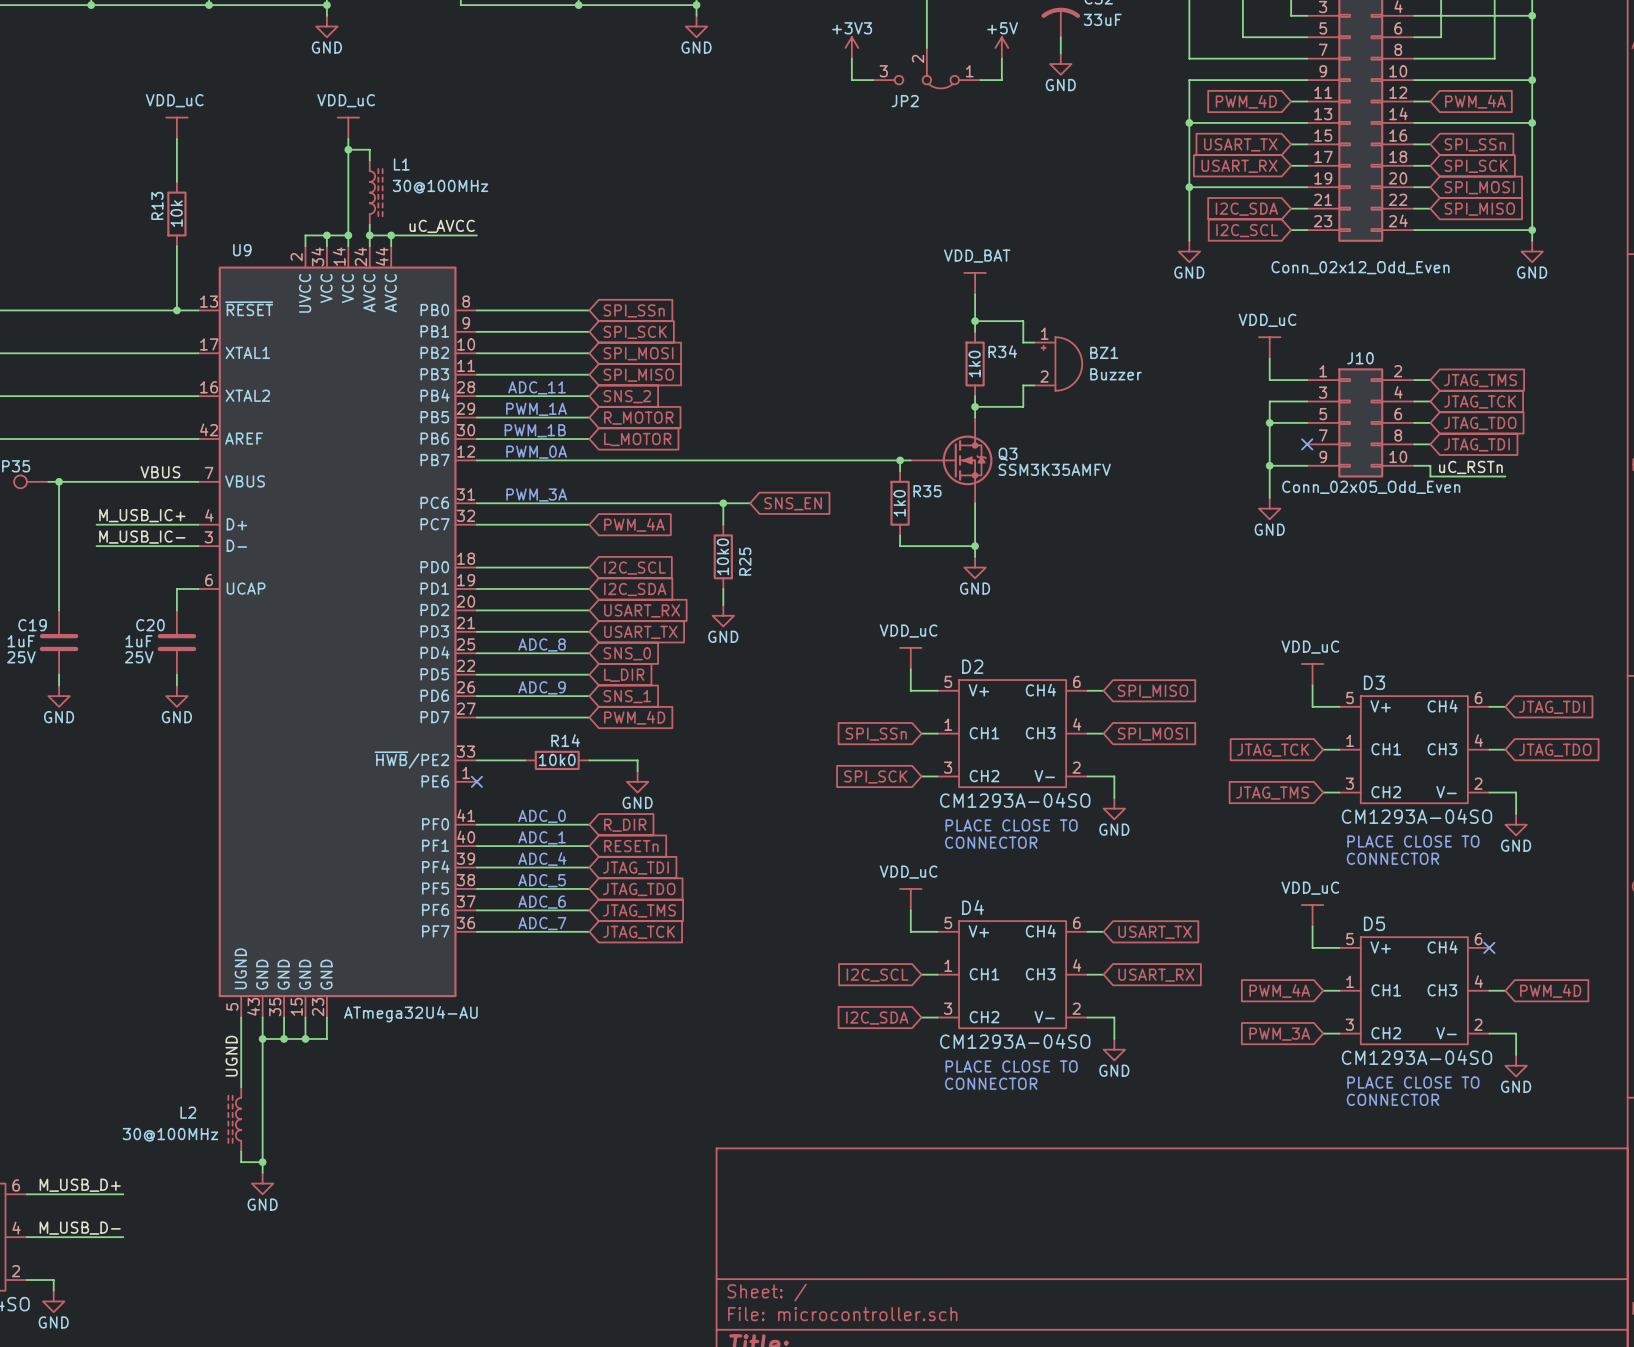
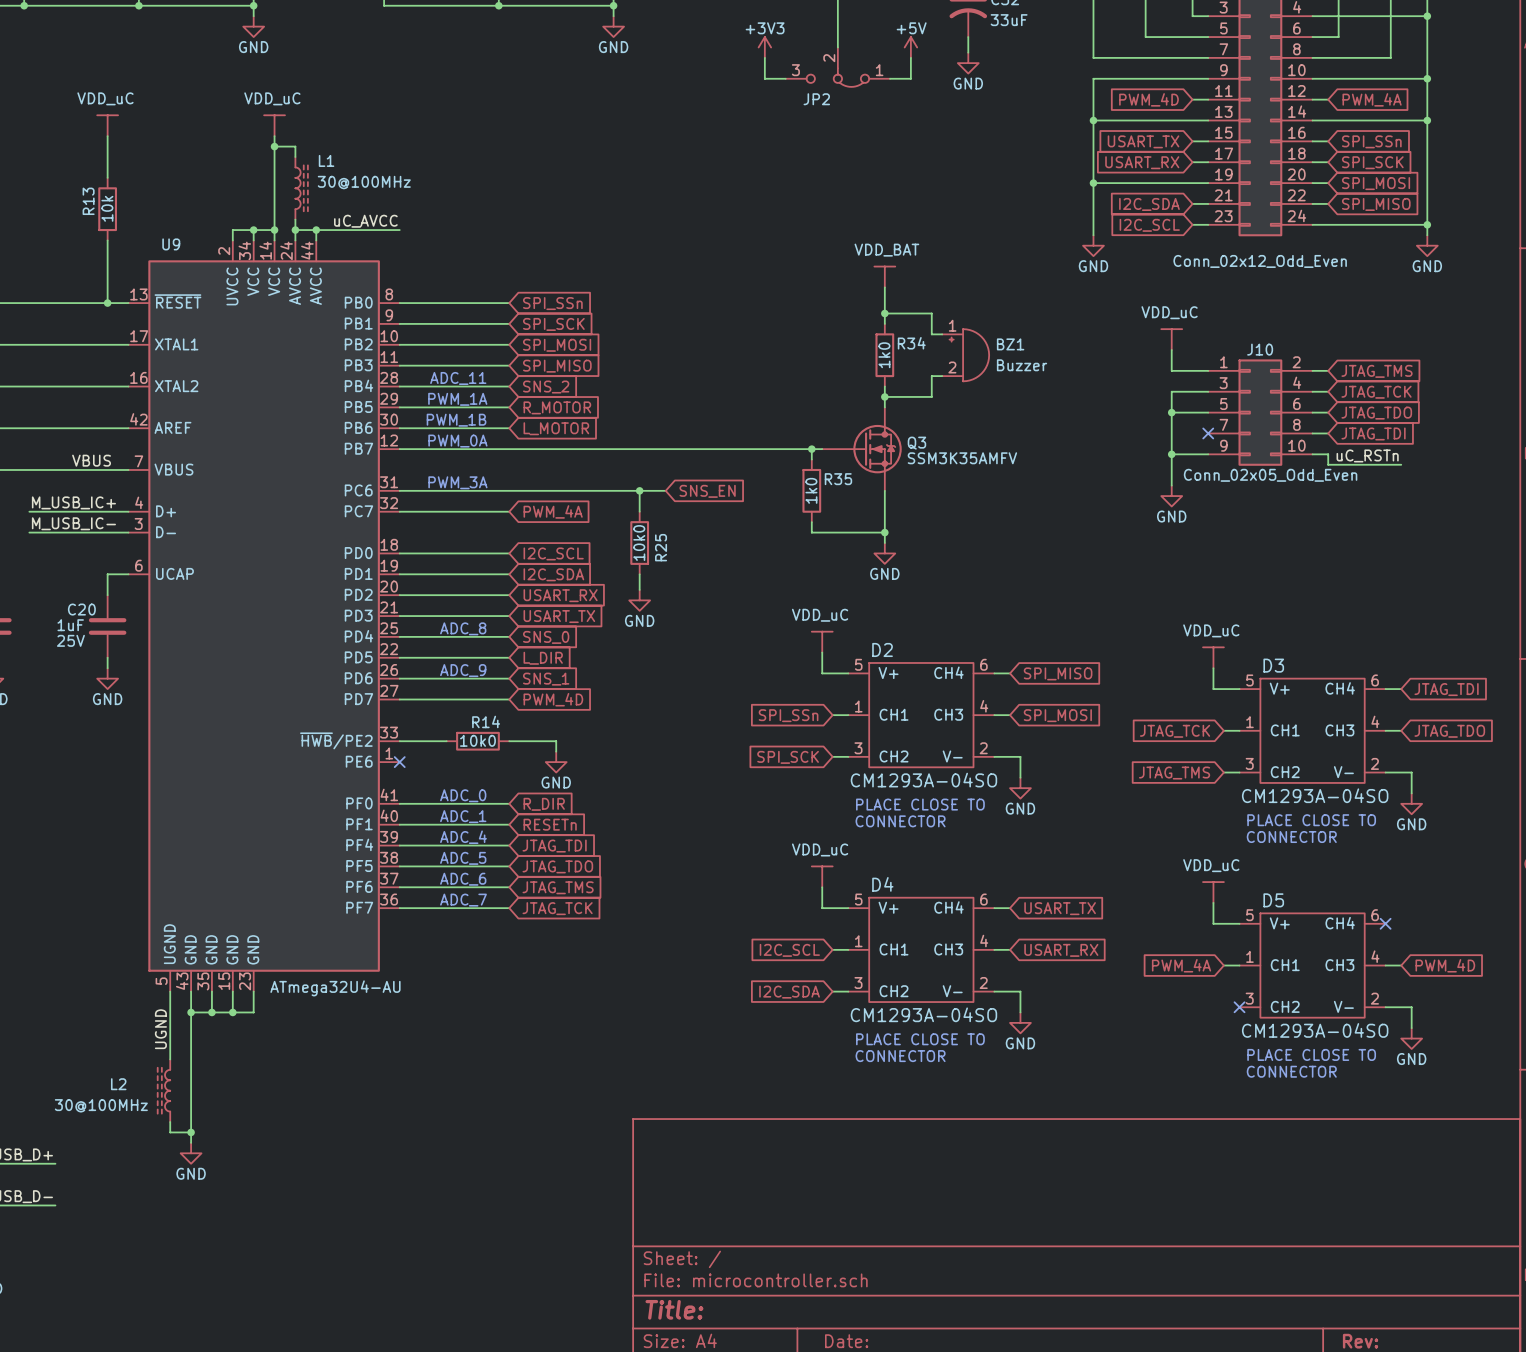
wire: (1323, 1033) (1339, 1033) -> none
no-connect mark: none -> (1239, 1007)
global label: PWM_3A (1279, 1034) -> none

